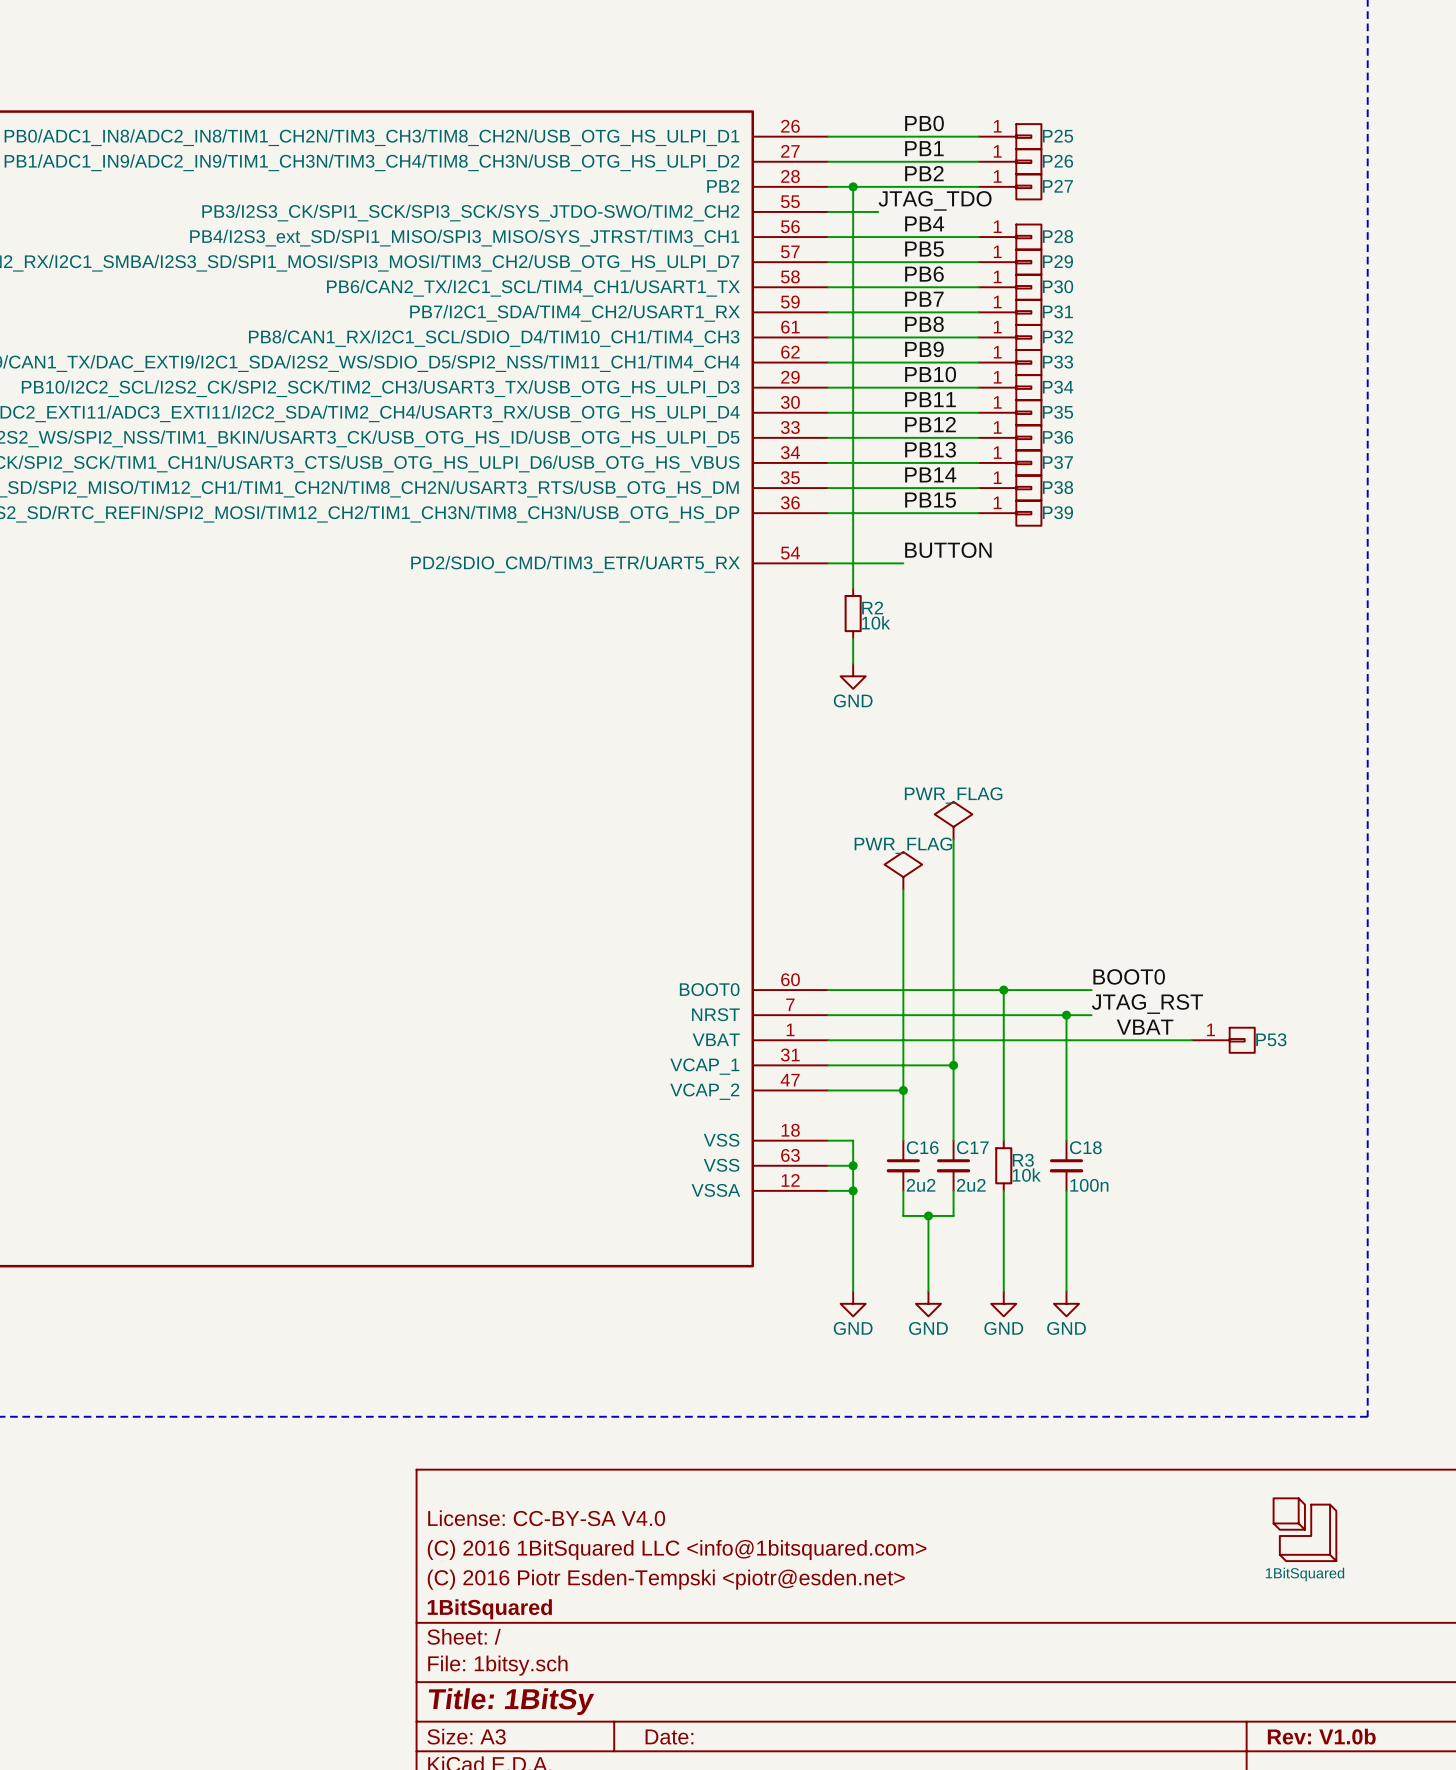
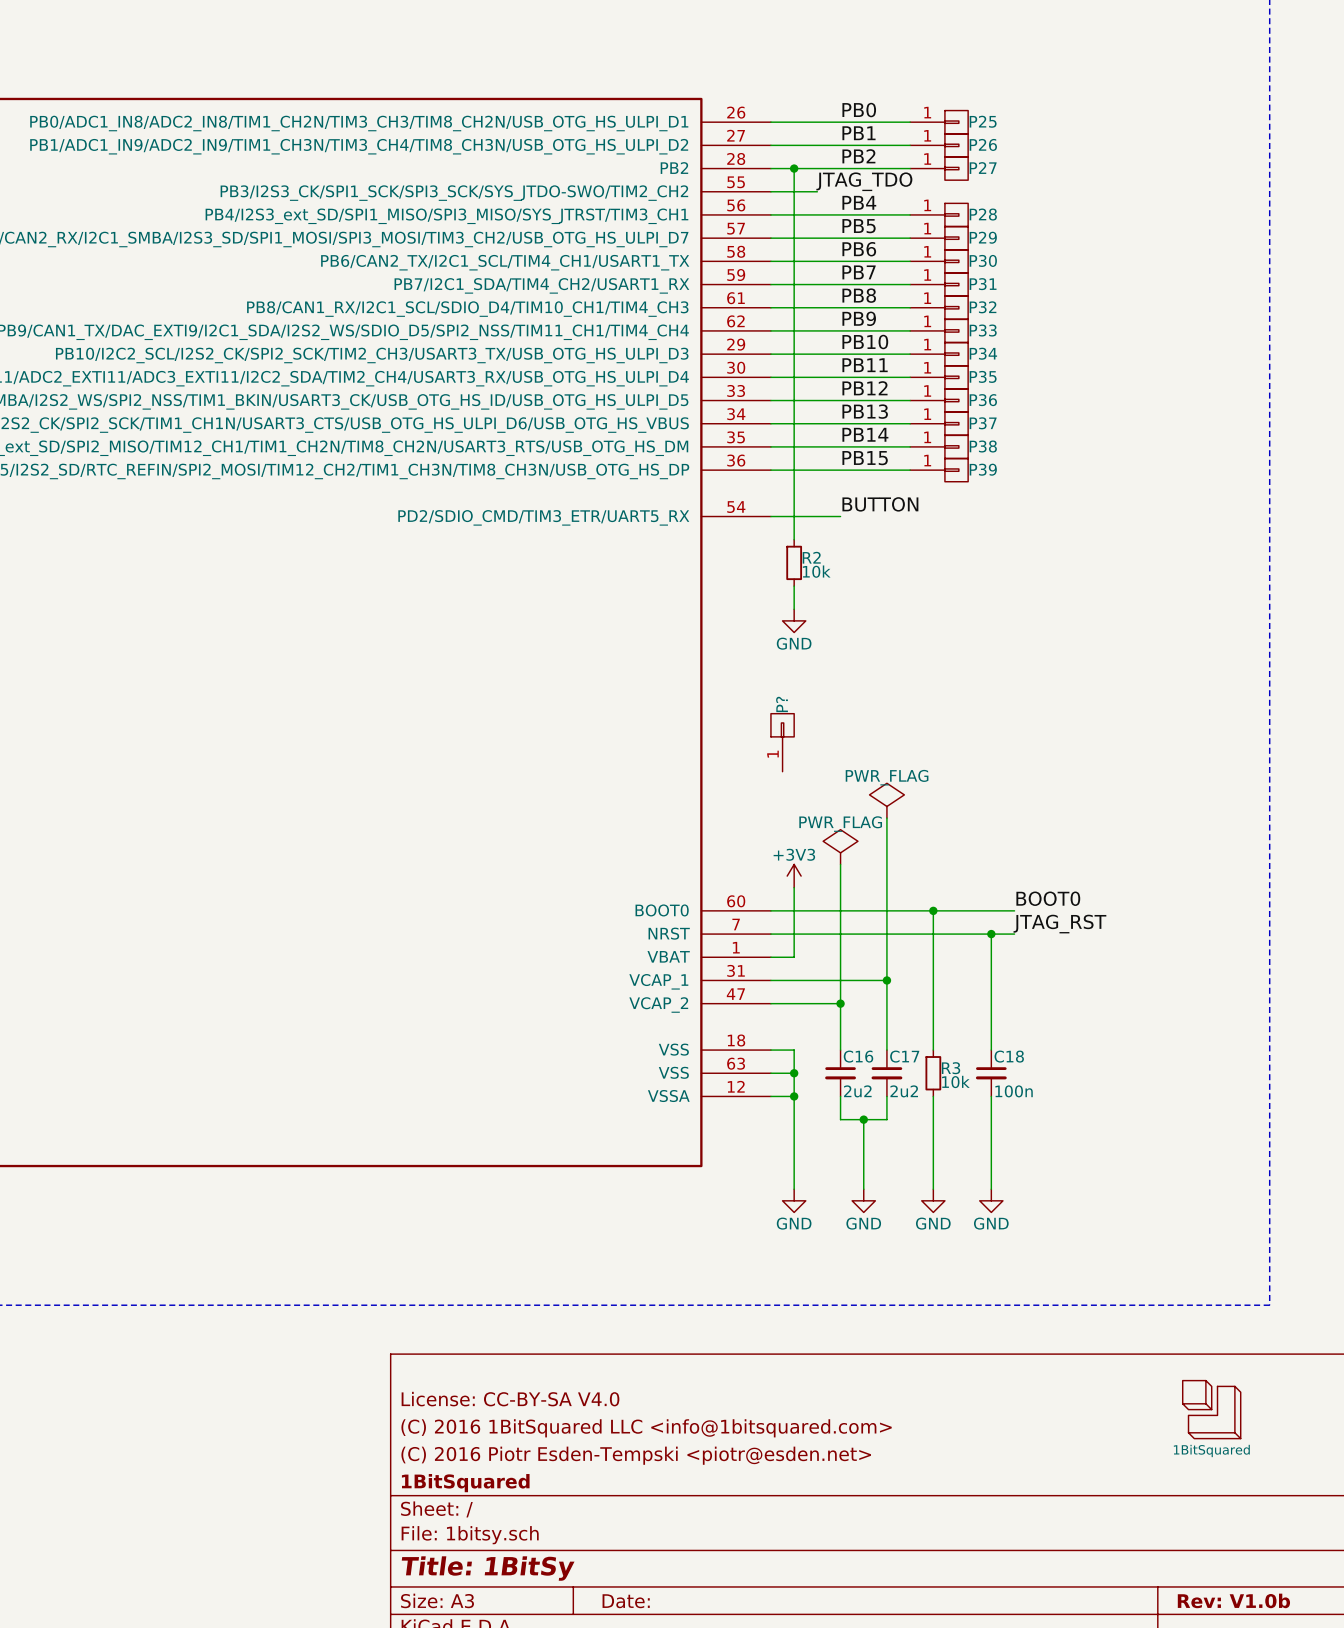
P?: none -> (782, 742)
power symbol: PWR_FLAG (953, 820) -> none
wire: (953, 839) (953, 889) -> none
power symbol: PWR_FLAG (903, 870) -> none
power symbol: none -> PWR_FLAG (886, 800)
wire: (903, 889) (903, 939) -> none
power symbol: none -> PWR_FLAG (840, 847)
power symbol: none -> +3V3 (794, 876)
label: VBAT (1145, 1027) -> none
wire: (853, 1040) (1192, 1040) -> (794, 957) (794, 887)
P53: (1223, 1040) -> none

